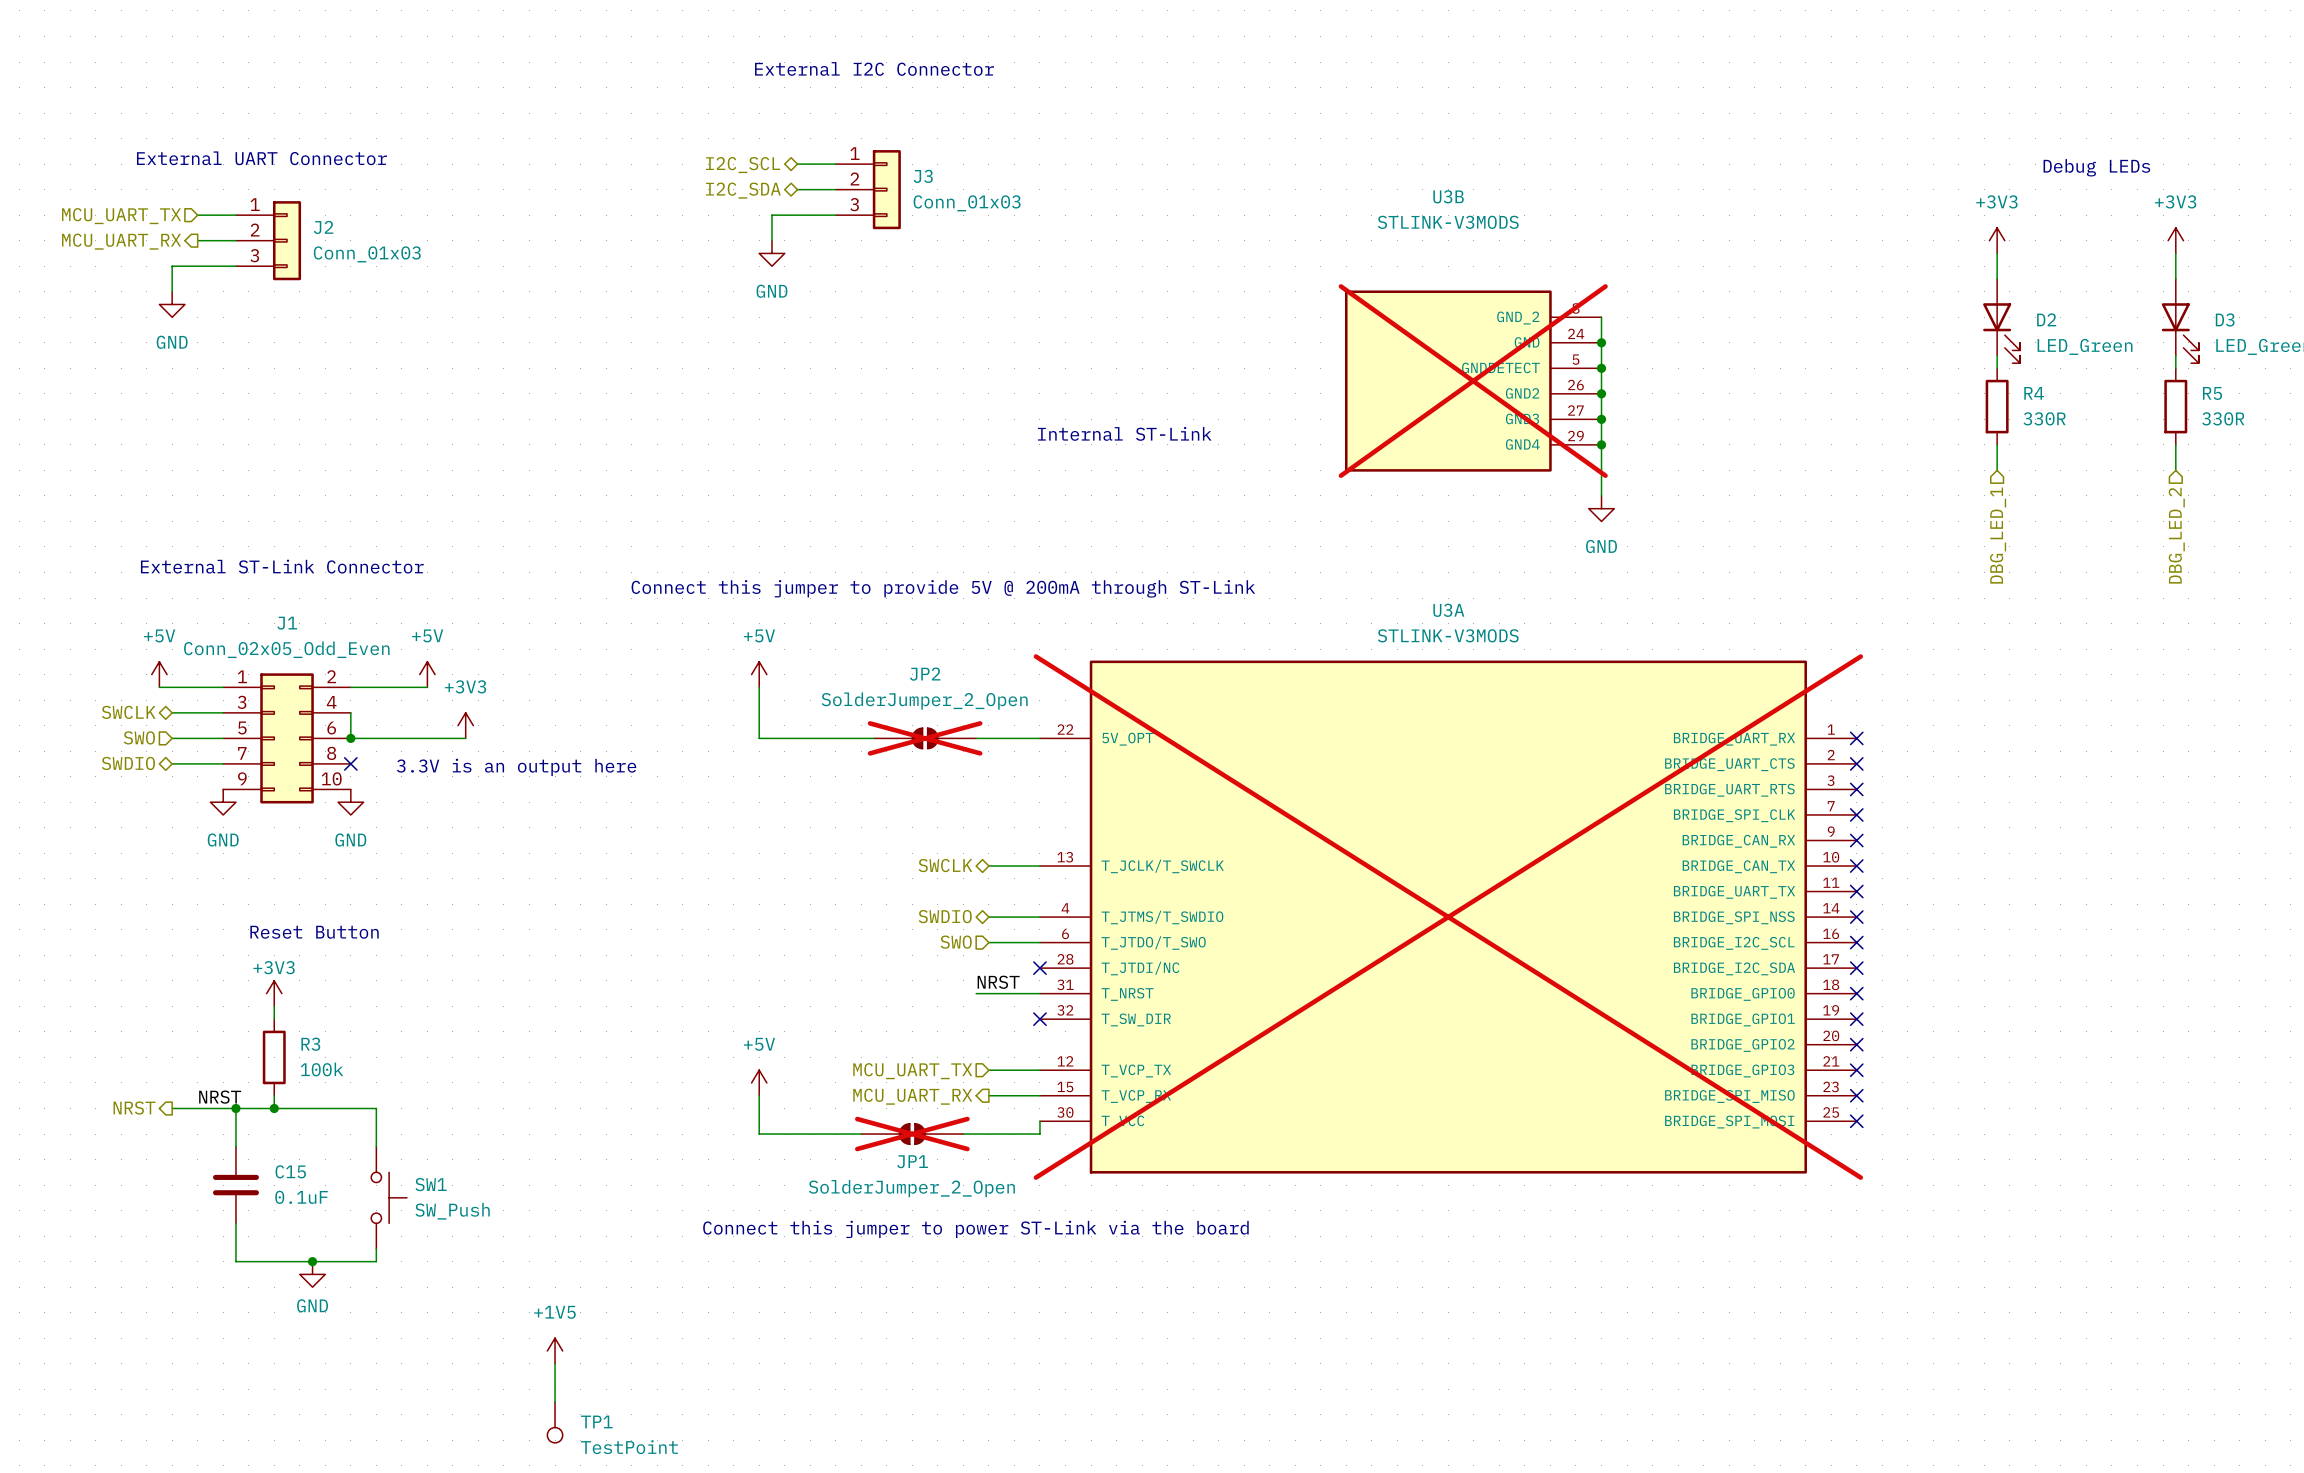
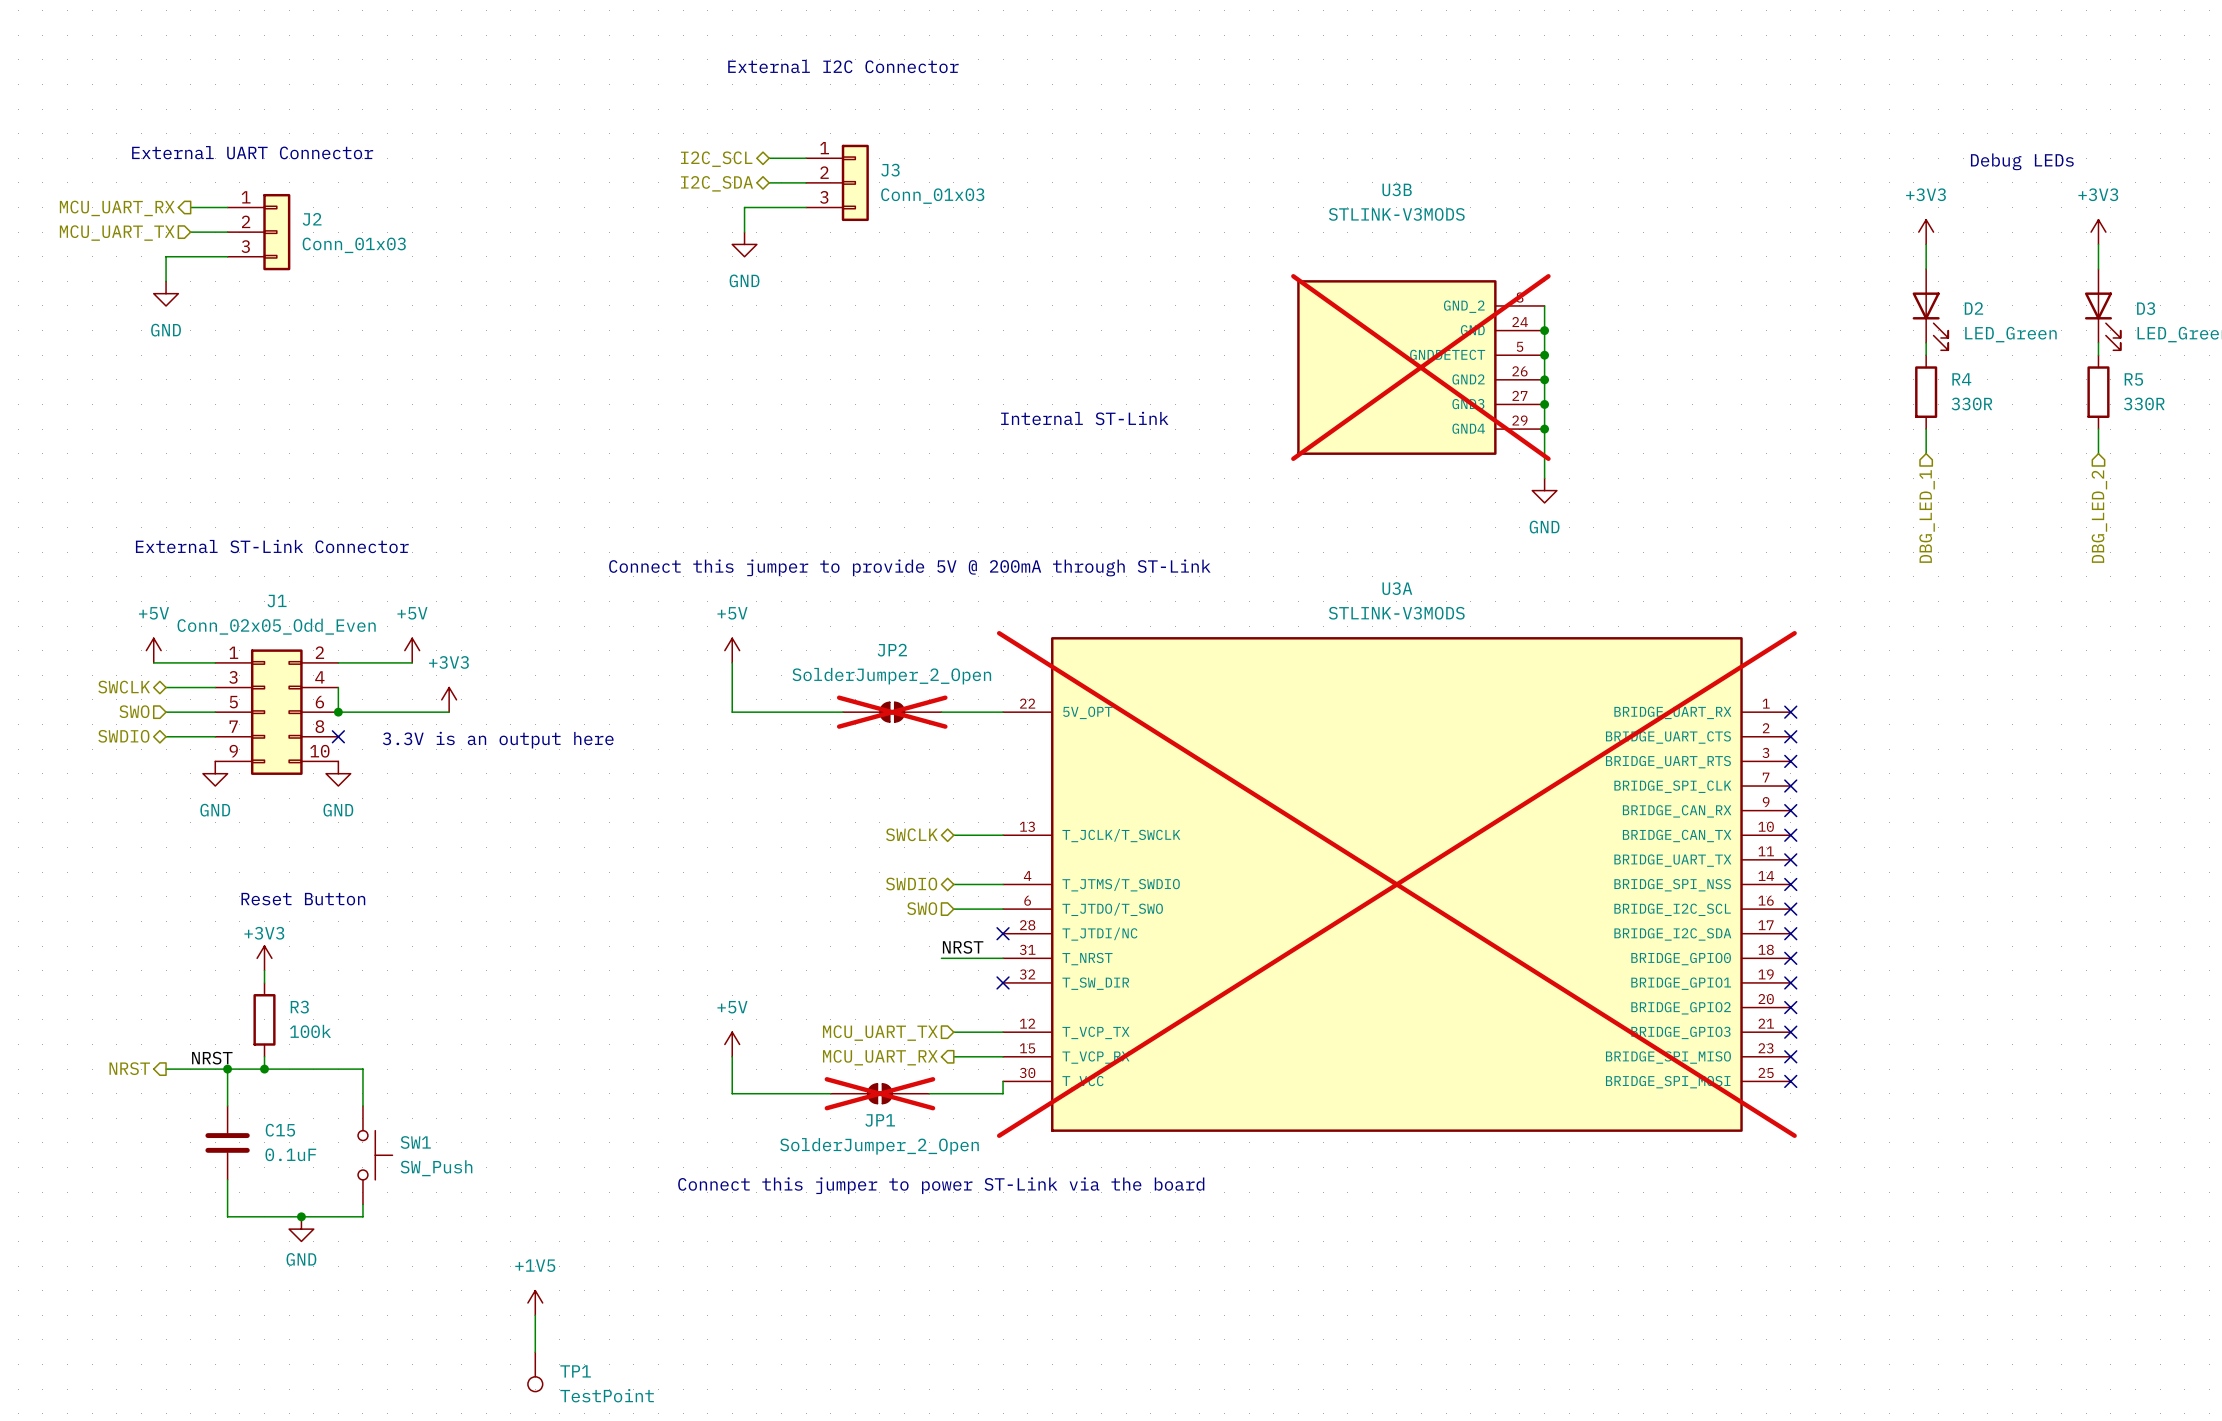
hierarchical label shape: input (121, 216) -> output (117, 208)
hierarchical label: MCU_UART_TX (121, 216) -> MCU_UART_RX (117, 208)
hierarchical label shape: output (121, 241) -> input (117, 233)
hierarchical label: MCU_UART_RX (121, 241) -> MCU_UART_TX (117, 233)

